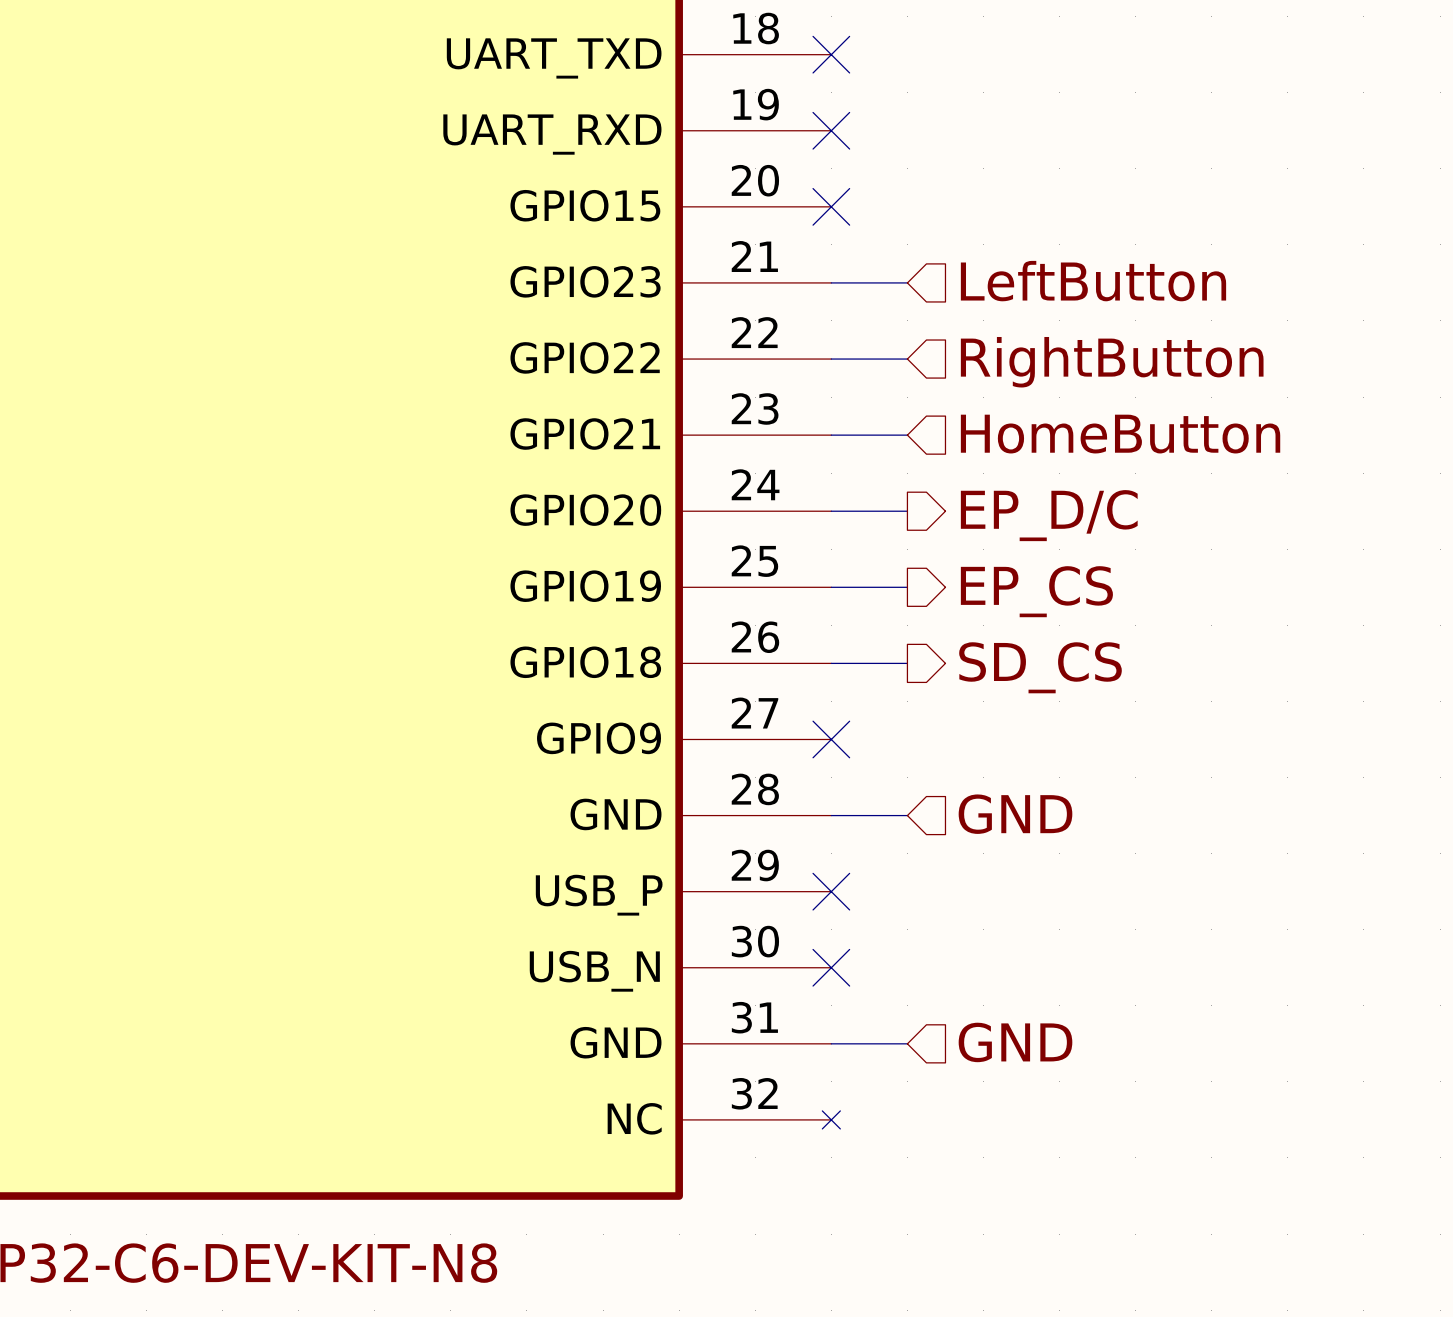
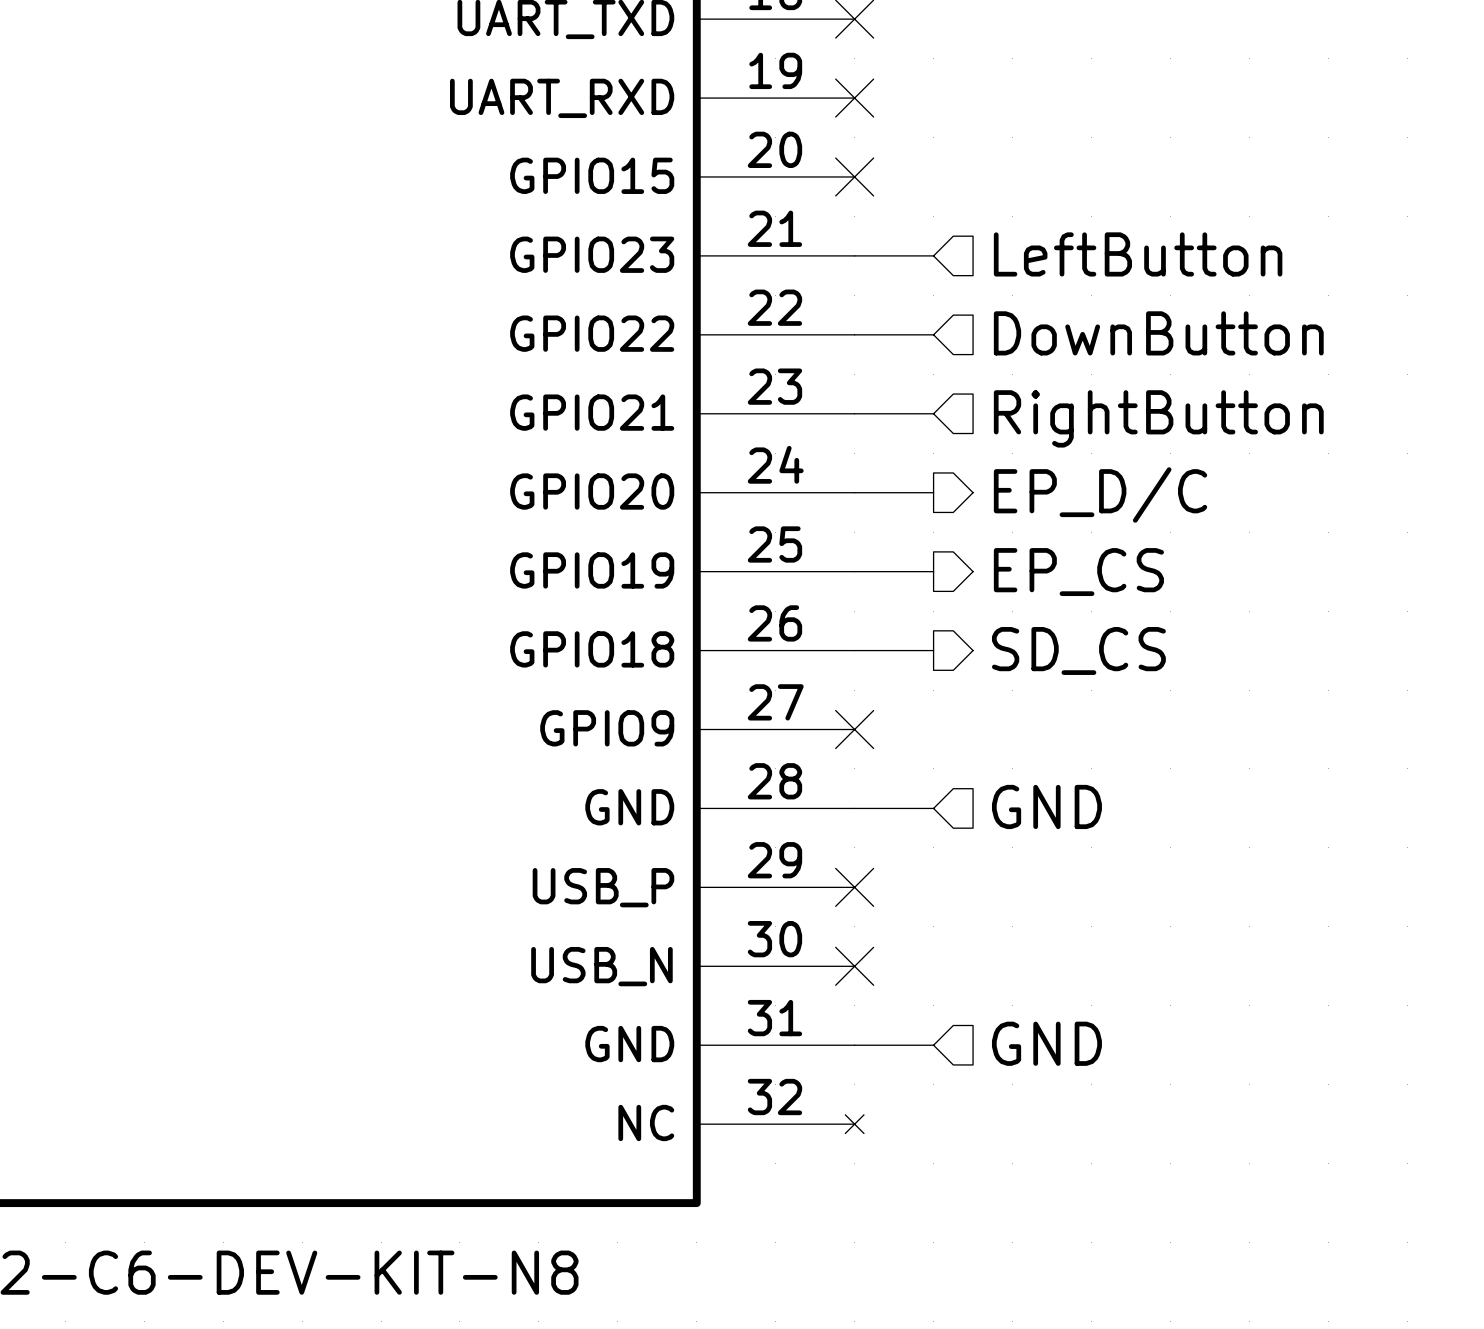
hierarchical label: RightButton (1112, 362) -> DownButton (1158, 333)
hierarchical label: HomeButton (1120, 434) -> RightButton (1158, 418)

